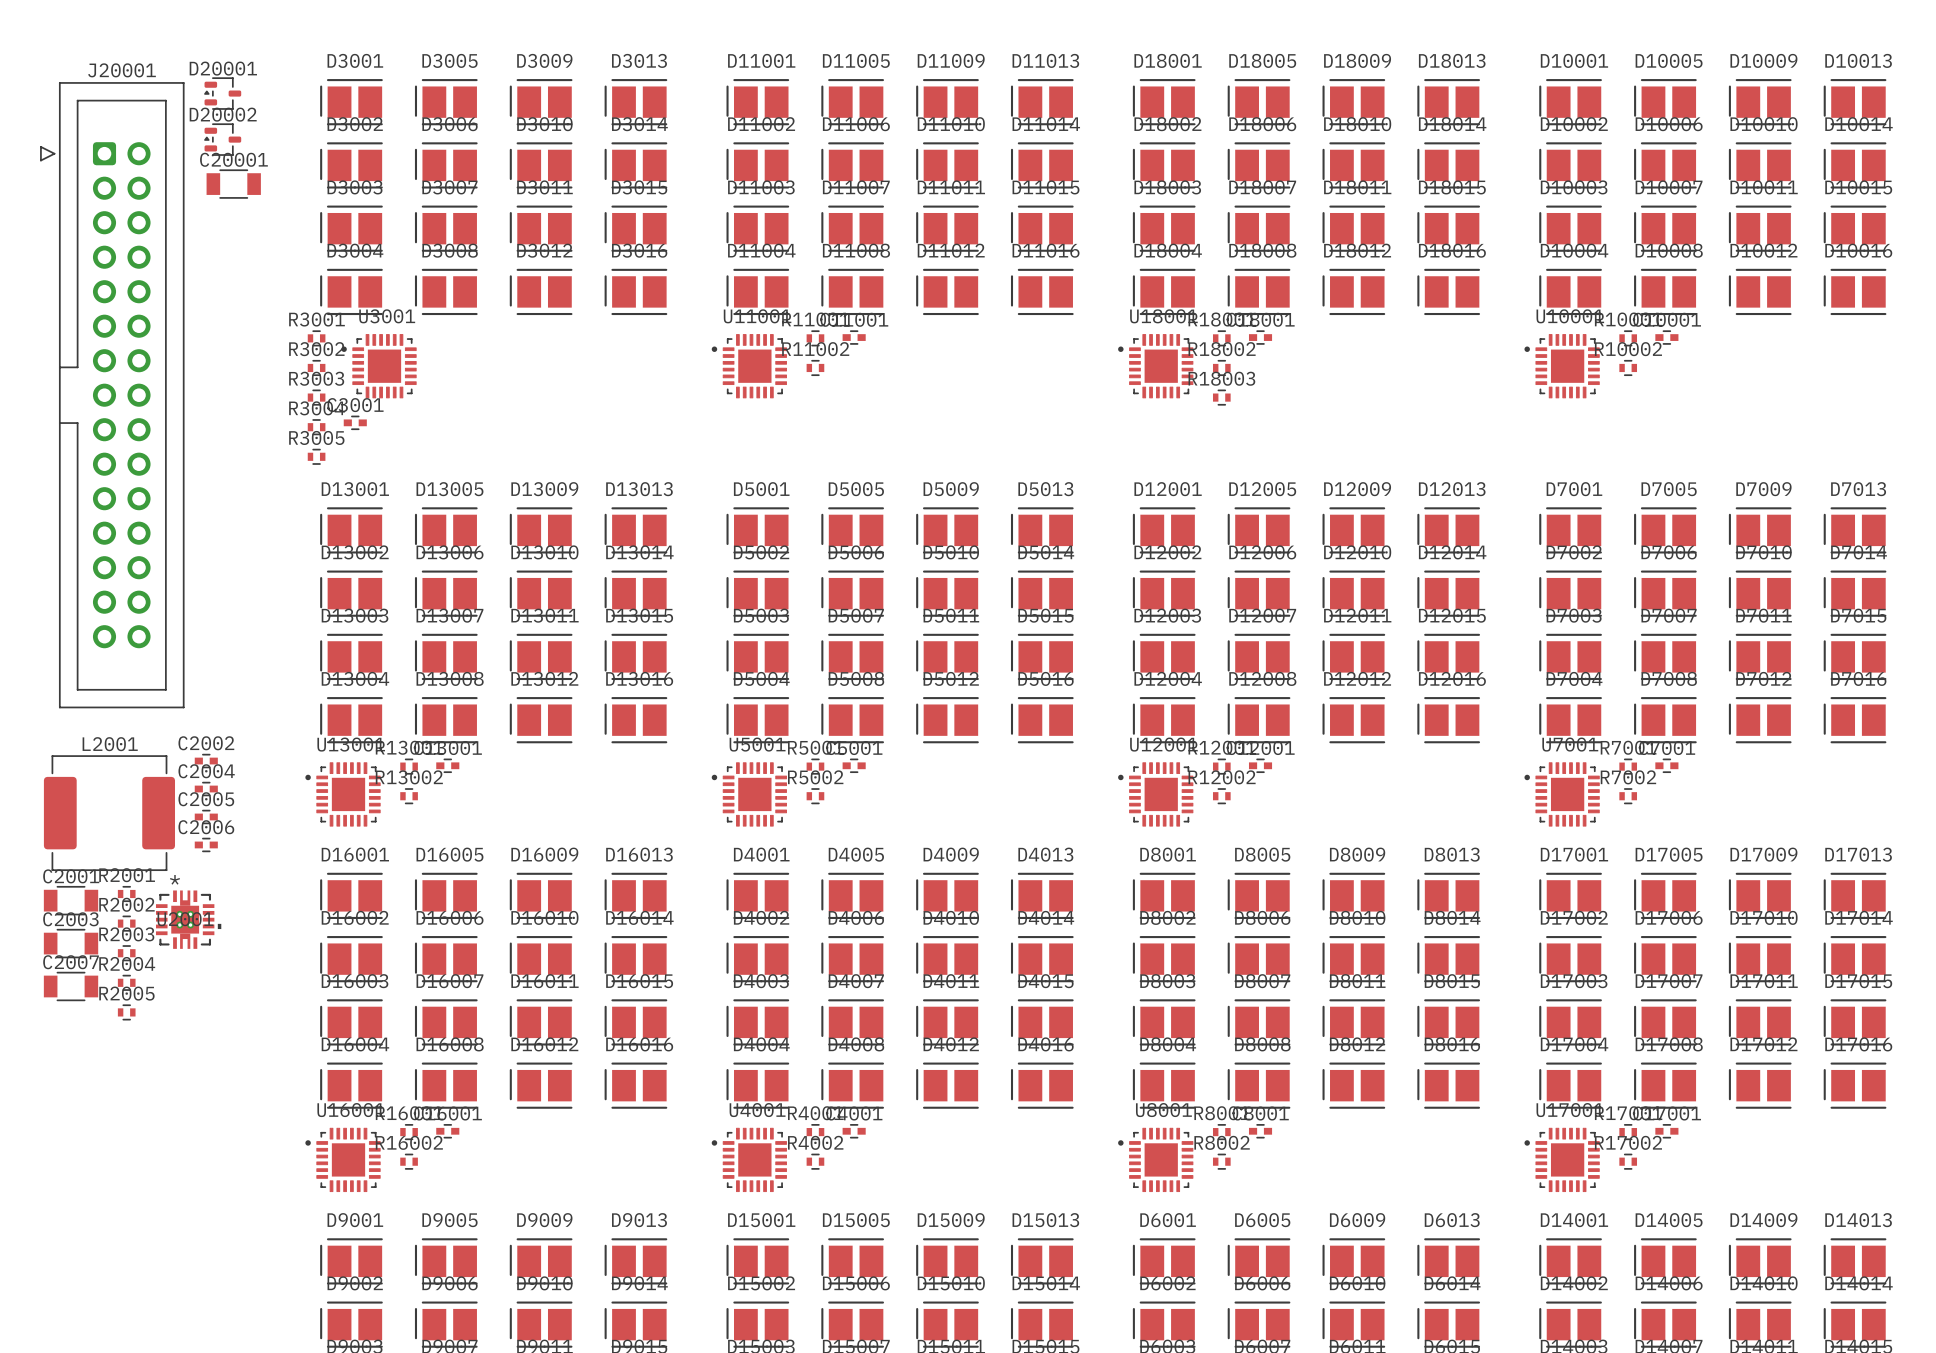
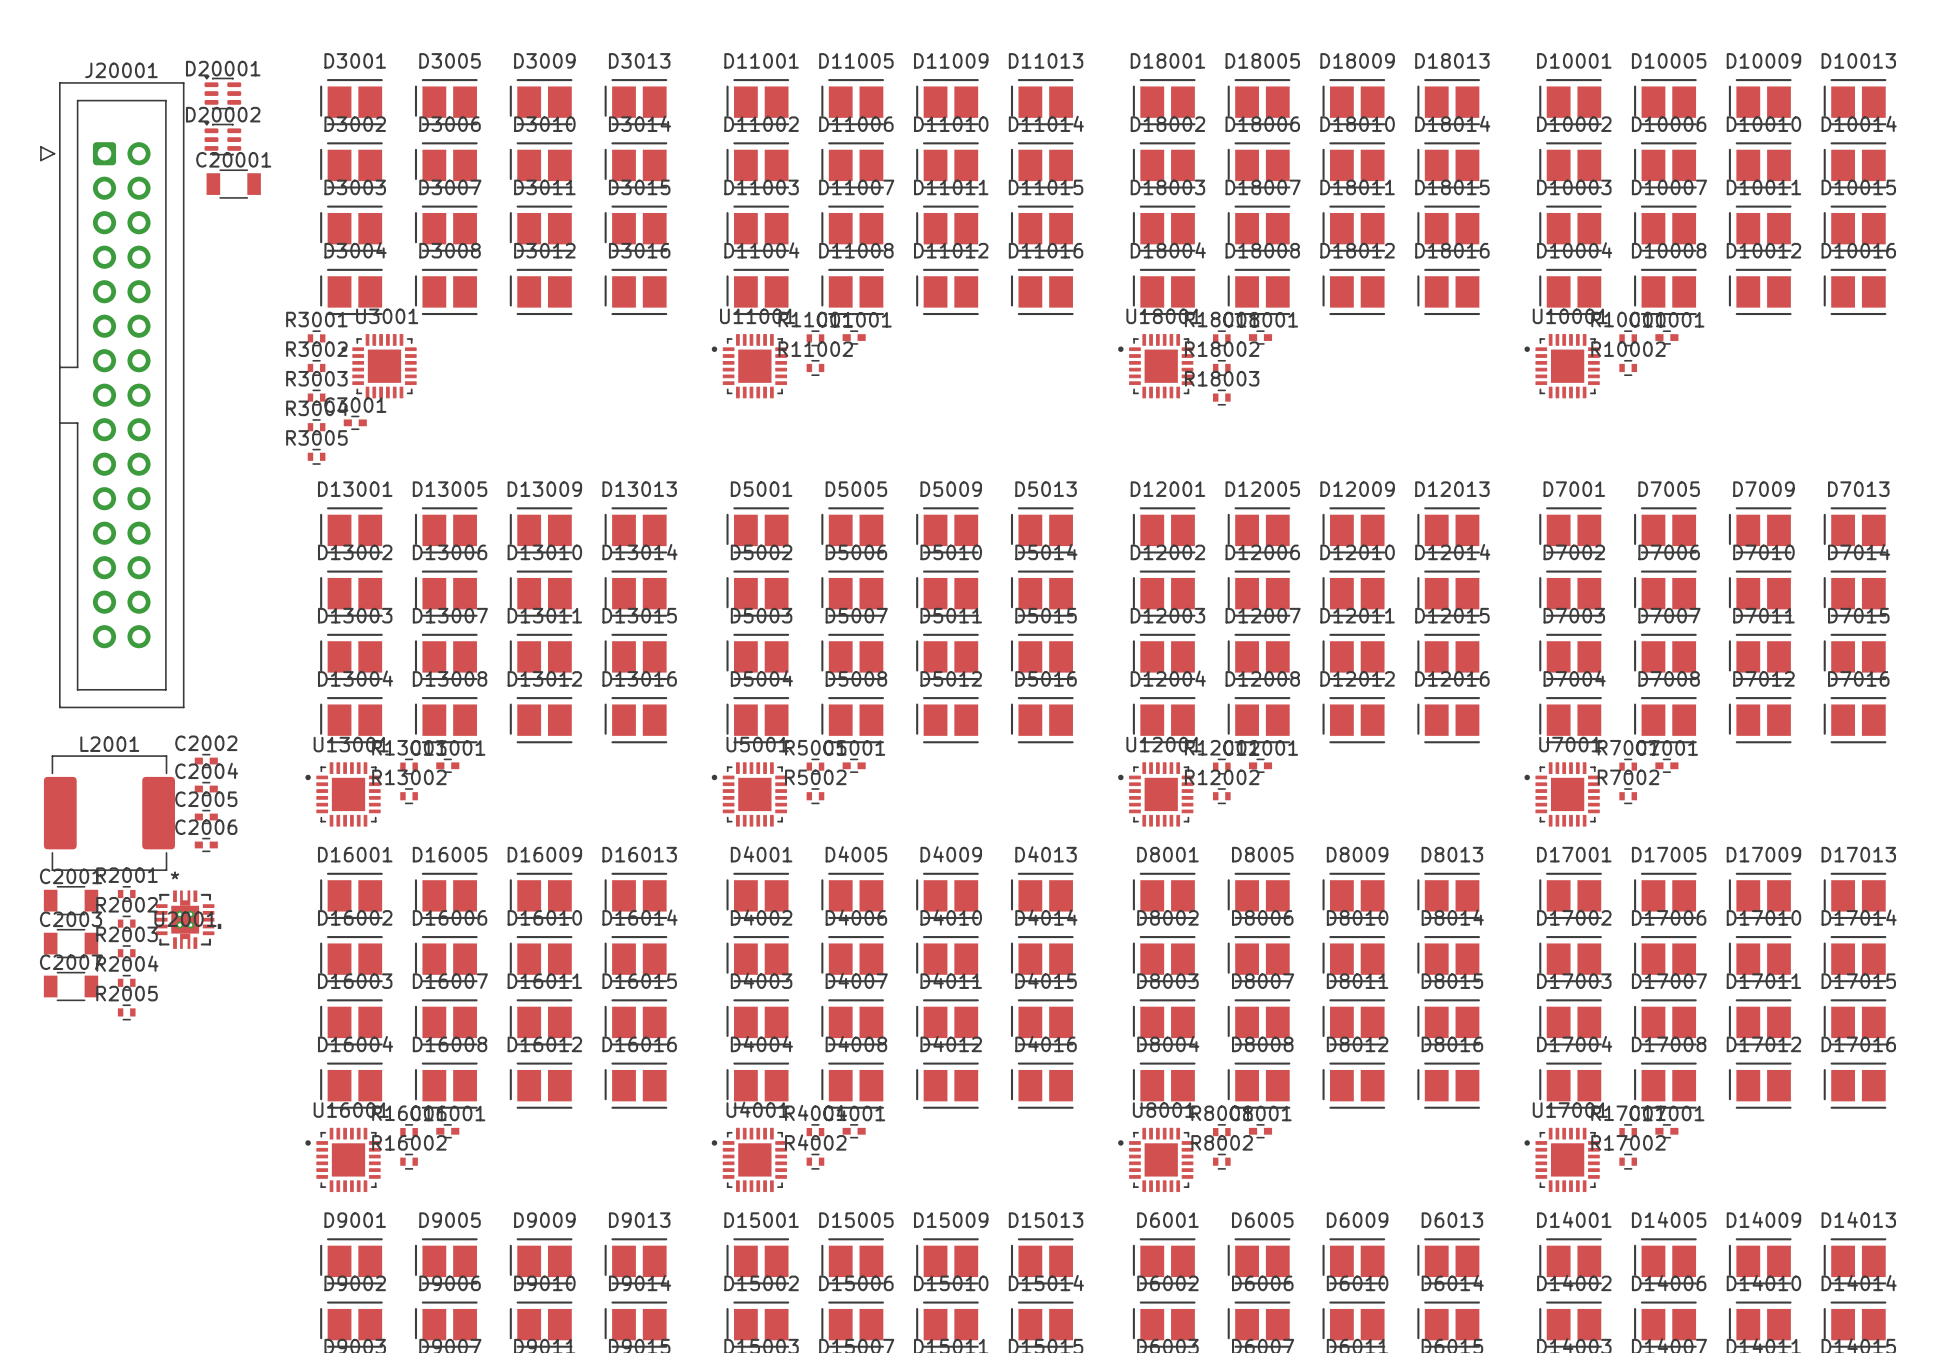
D20001 footprint: [204, 77, 242, 110] -> [204, 75, 242, 110]
D20002 footprint: [204, 123, 242, 156] -> [204, 121, 242, 156]

